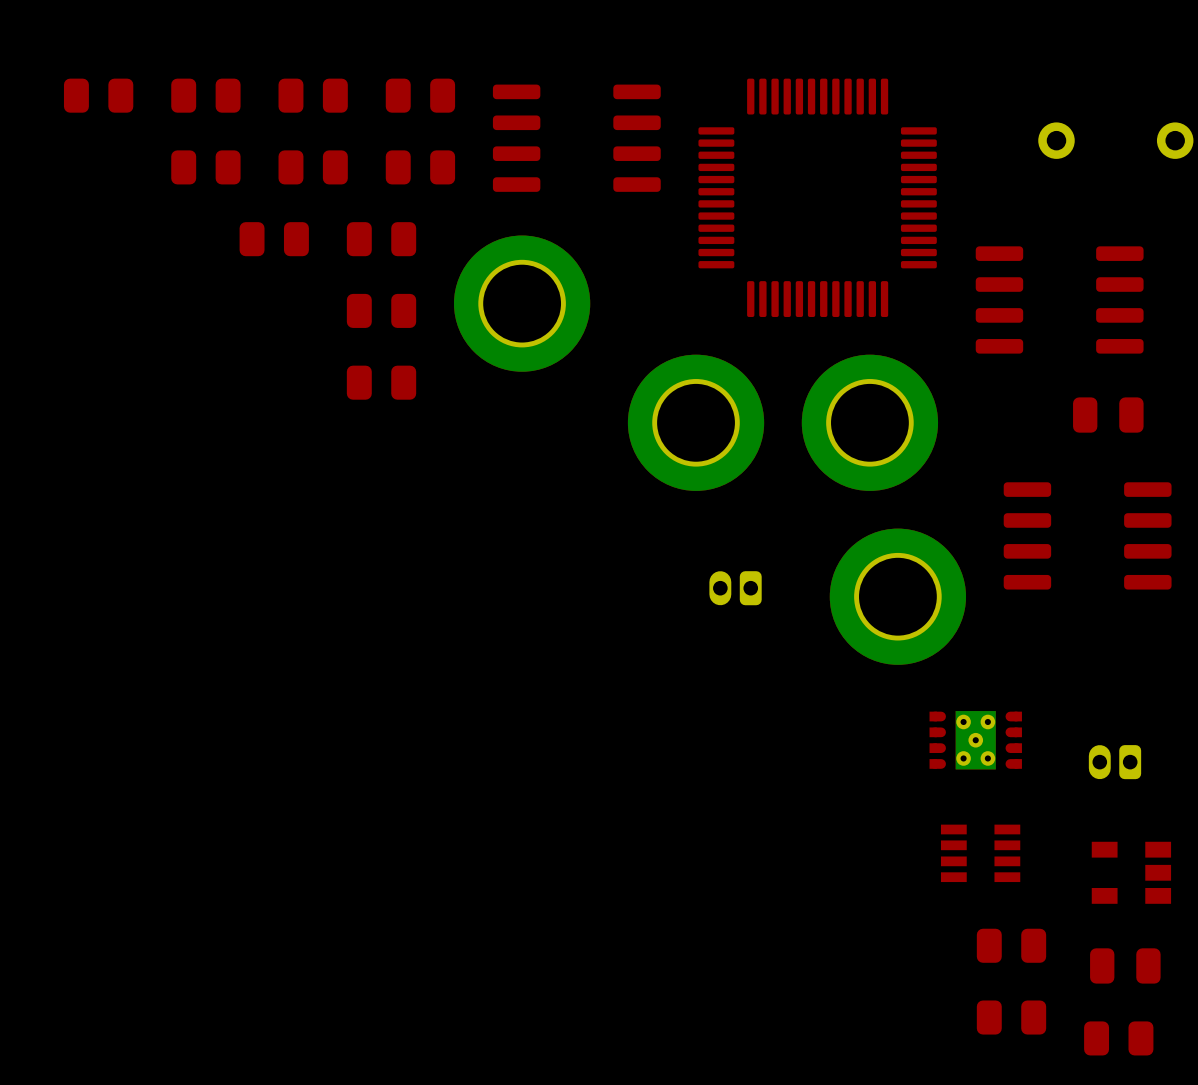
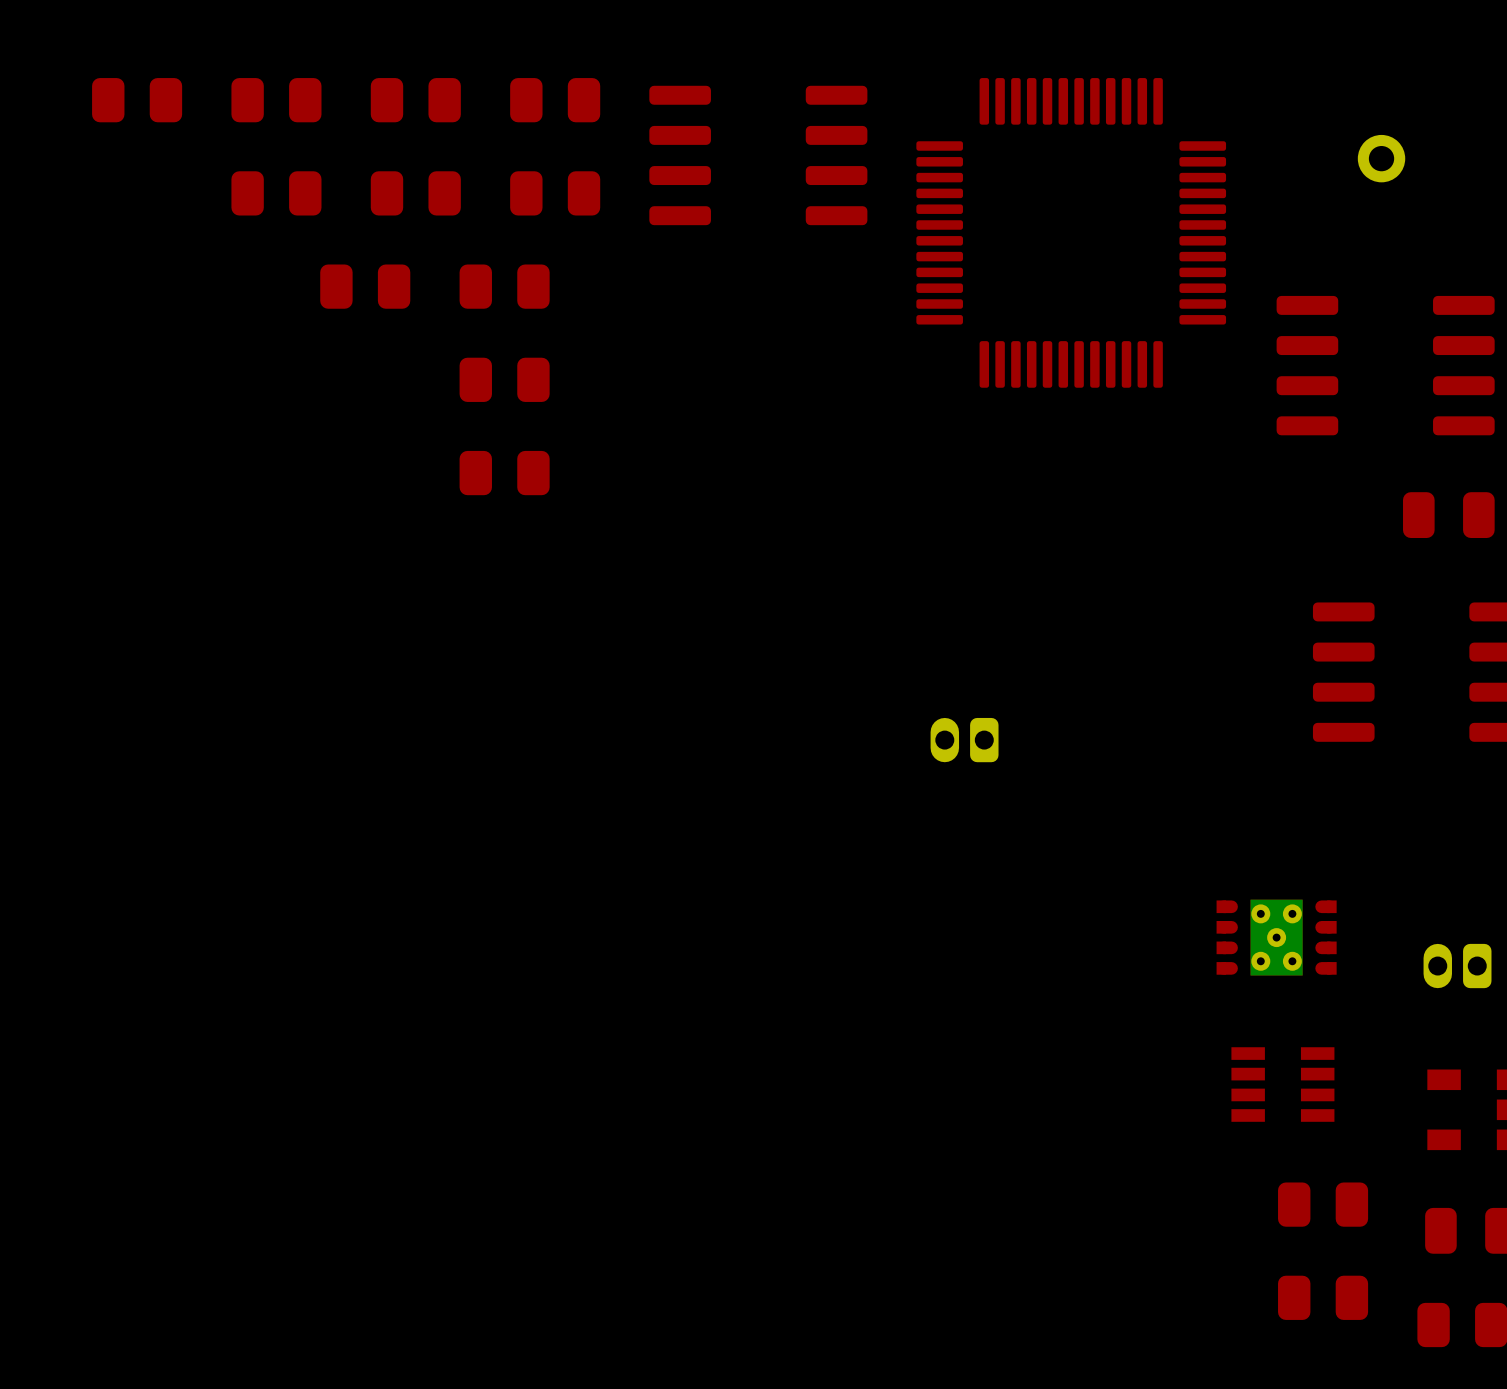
part: (522, 303) -> none
part: (696, 422) -> none
part: (869, 422) -> none
part: (897, 596) -> none

